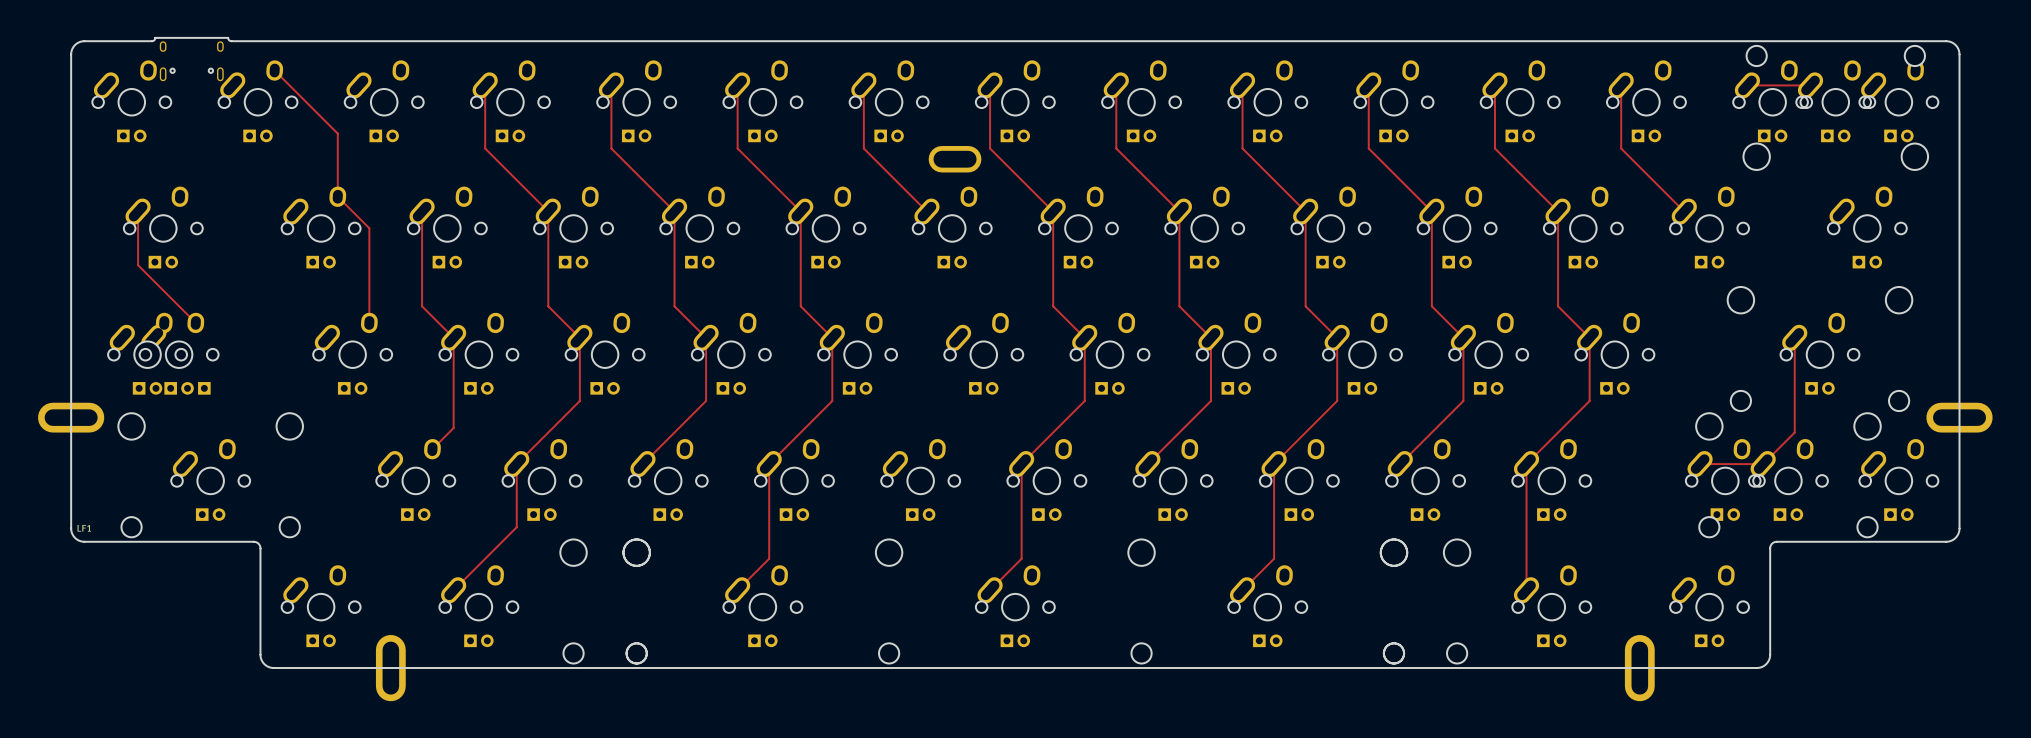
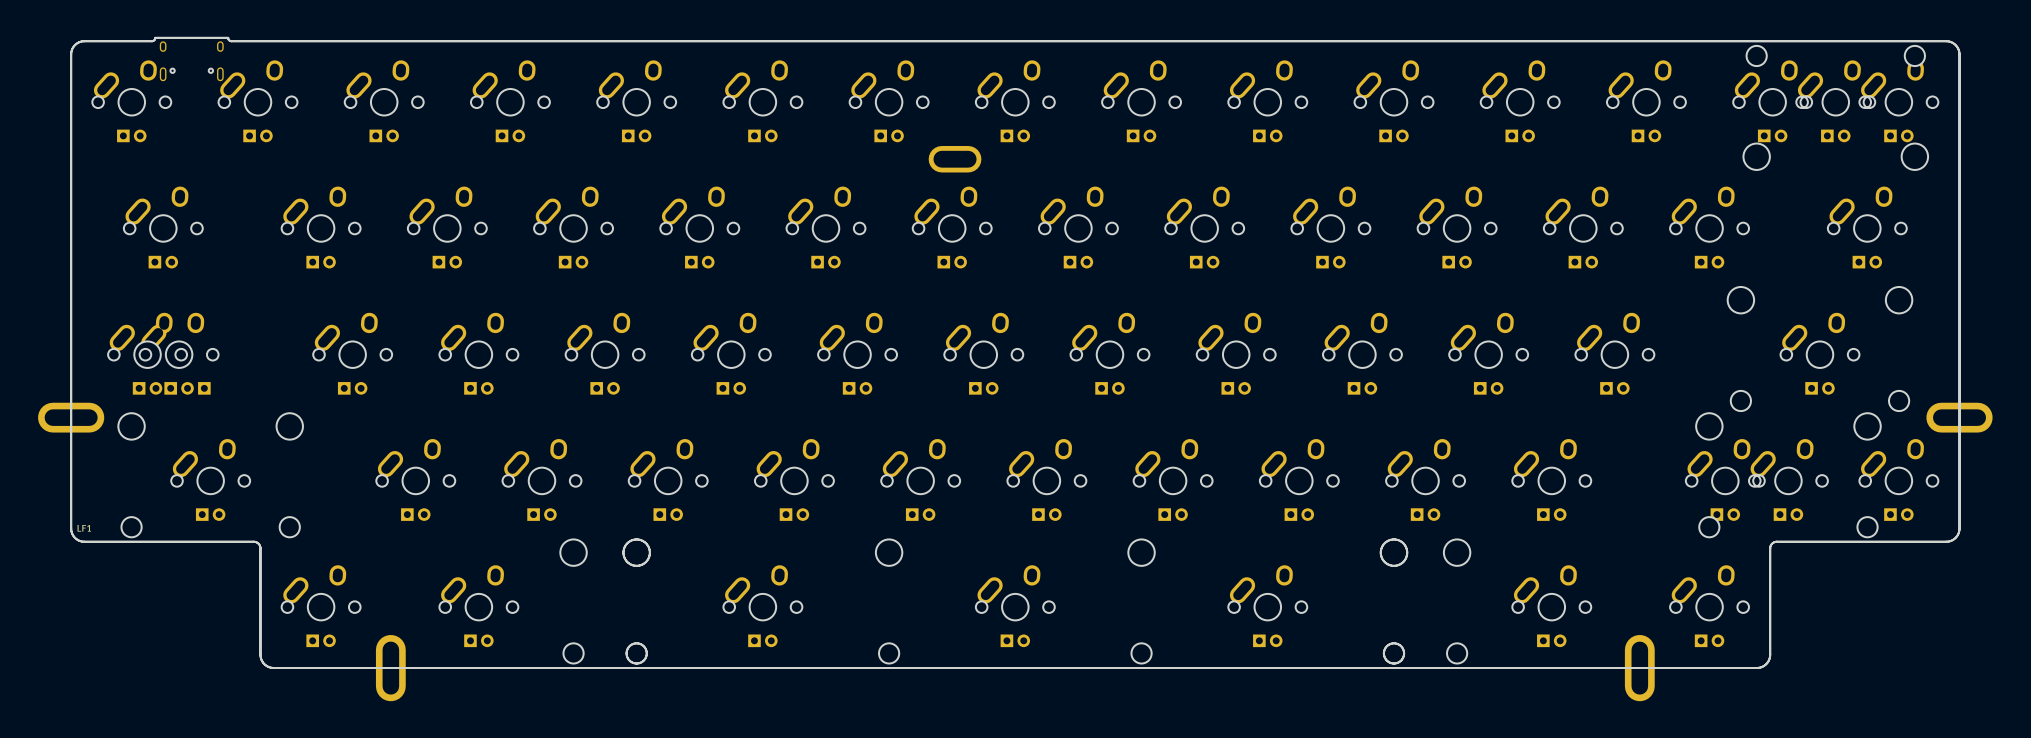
drawing: none -> [70, 36, 1961, 669]
track: (274, 70) (337, 133) (337, 196) (369, 228) (369, 322) -> none
track: (485, 85) (485, 148) (548, 211) (548, 306) (579, 337) (579, 400) (516, 464) (516, 527) (453, 590) -> none
track: (611, 85) (611, 148) (674, 211) (674, 306) (706, 337) (706, 400) (642, 464) -> none
track: (737, 85) (737, 148) (800, 211) (800, 306) (832, 337) (832, 400) (769, 464) (769, 558) (737, 590) -> none
track: (863, 85) (863, 148) (926, 211) -> none
track: (990, 85) (990, 148) (1053, 211) (1053, 306) (1084, 337) (1084, 400) (1021, 464) (1021, 558) (990, 590) -> none
track: (1116, 85) (1116, 148) (1179, 211) (1179, 306) (1210, 337) (1210, 400) (1147, 464) -> none
track: (1242, 85) (1242, 148) (1305, 211) (1305, 306) (1337, 337) (1337, 400) (1274, 464) (1274, 558) (1242, 590) -> none
track: (1368, 85) (1368, 148) (1431, 211) (1431, 306) (1463, 337) (1463, 400) (1400, 464) -> none
track: (1494, 85) (1494, 148) (1558, 211) (1558, 306) (1589, 337) (1589, 400) (1526, 464) (1526, 590) -> none
track: (1621, 85) (1621, 148) (1684, 211) -> none
track: (1747, 85) (1810, 85) -> none
track: (138, 211) (138, 265) (195, 322) -> none
track: (422, 211) (422, 306) (453, 337) (453, 428) (432, 449) -> none
track: (1794, 337) (1794, 432) (1763, 464) (1700, 464) -> none

